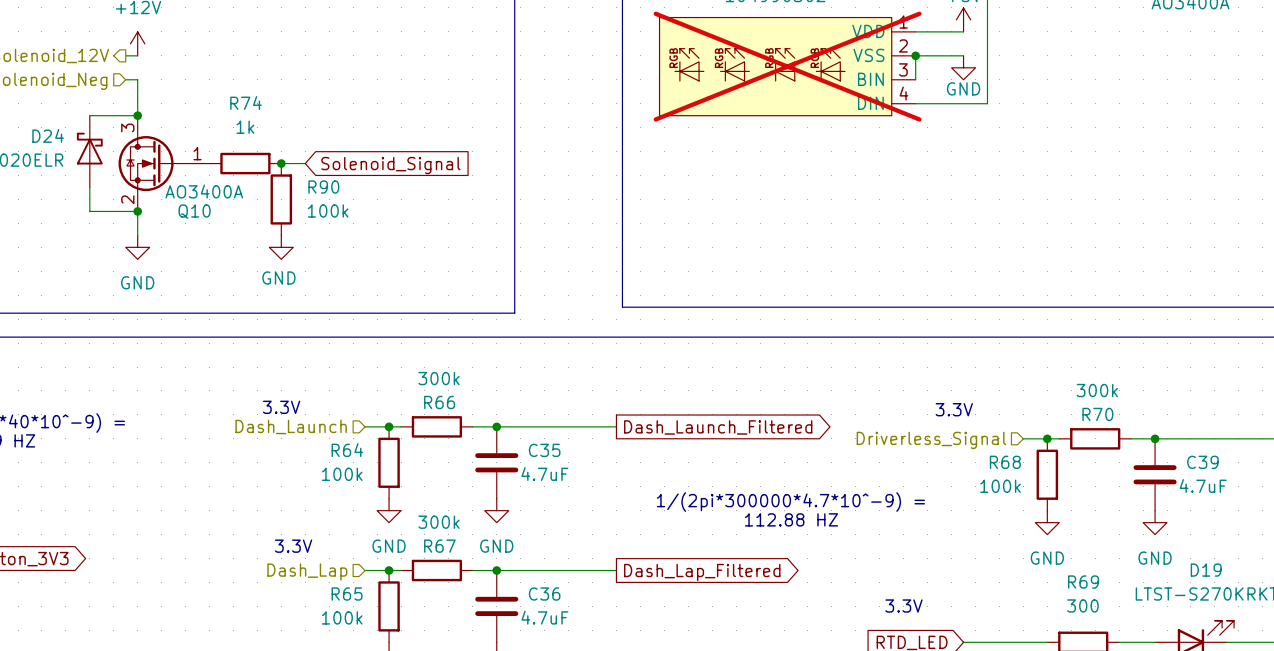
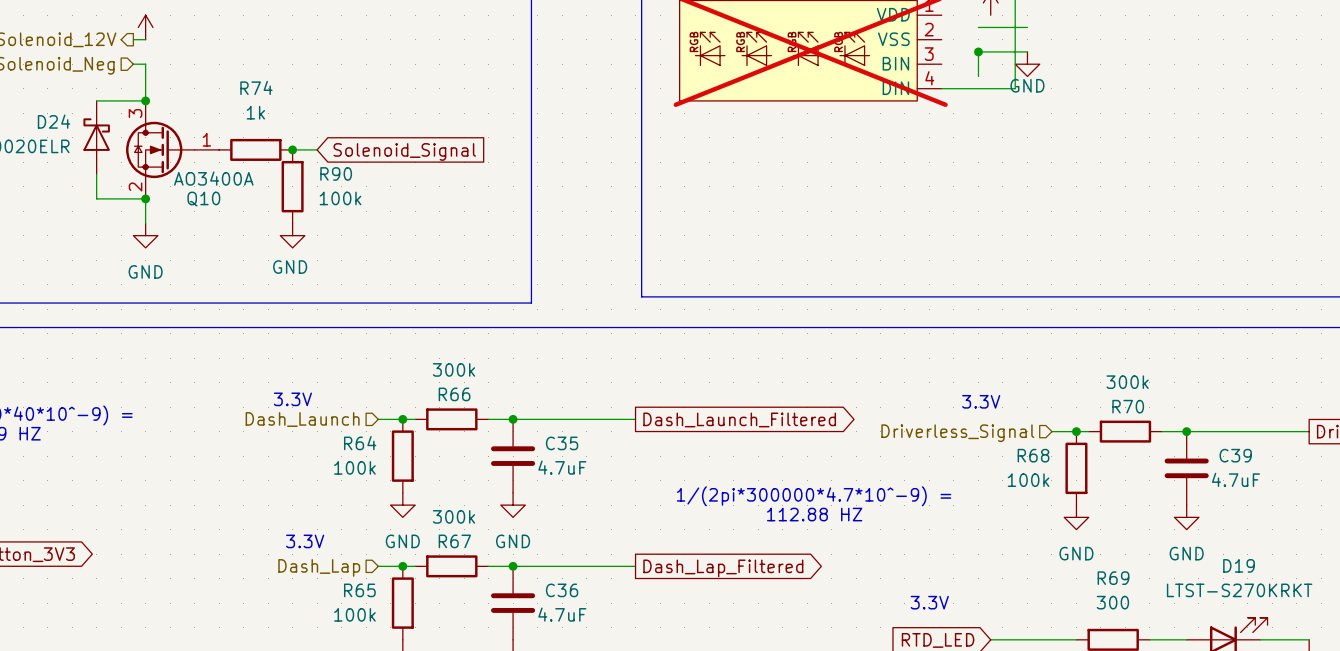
wire: (915, 31) (963, 31) -> (978, 27) (1027, 27)
junction position: (915, 55) -> (978, 51)
wire: (963, 55) (915, 55) (915, 79) -> (1027, 51) (978, 51) (978, 76)
power symbol position: GND (963, 67) -> GND (1027, 64)

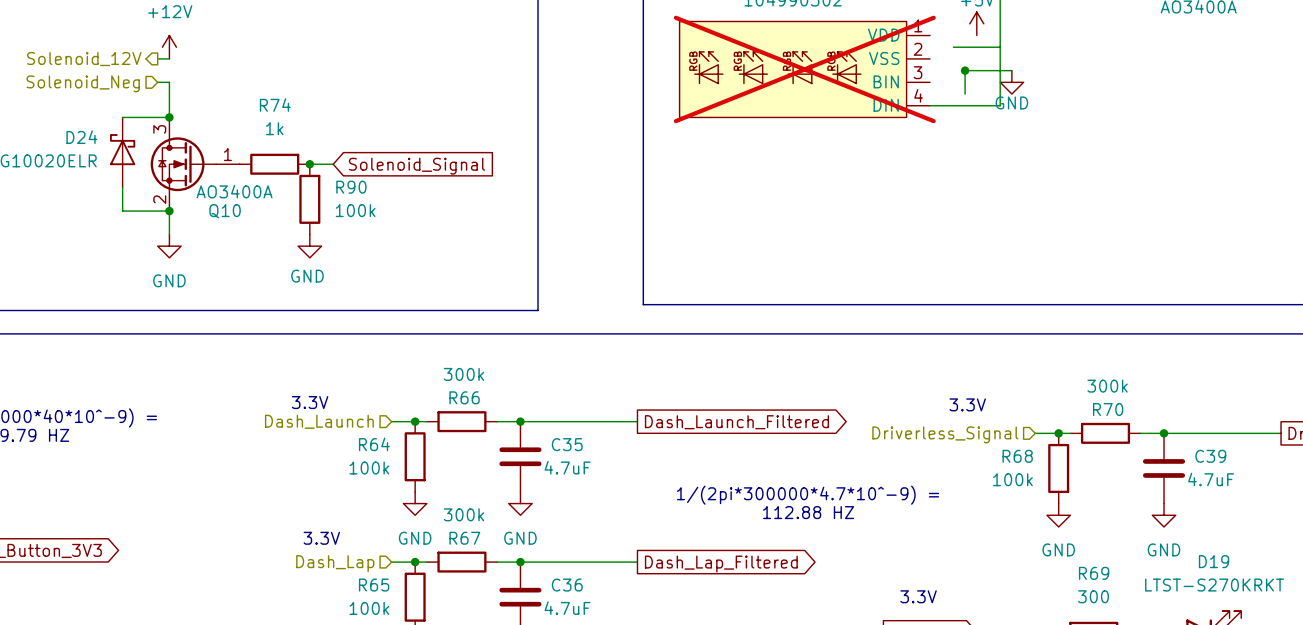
wire: (1015, 27) (1027, 27) -> (953, 47) (965, 47)

